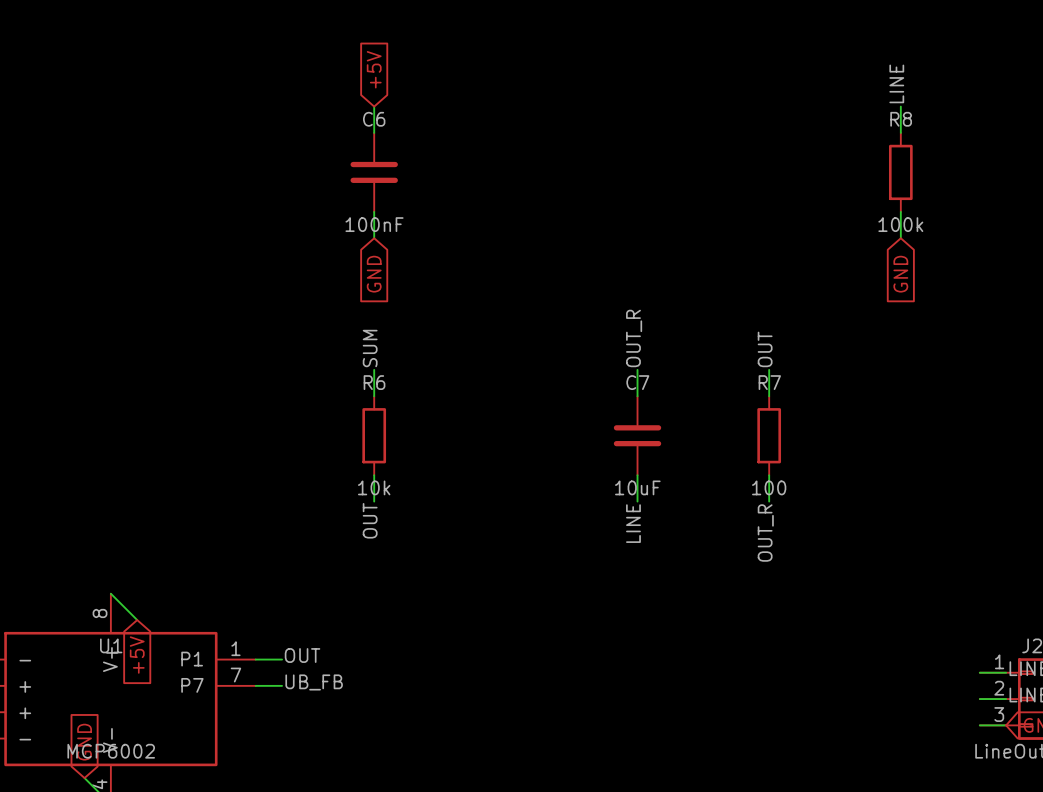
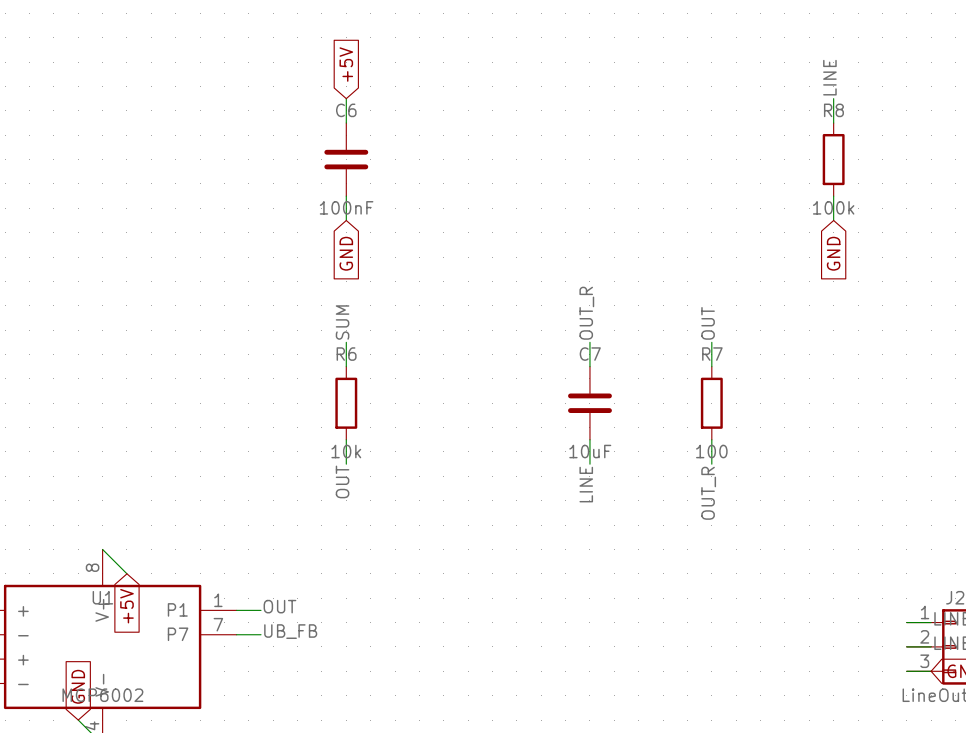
U1 pin name: - (25, 660) -> + (23, 611)
U1 pin name: + (25, 686) -> - (23, 635)

